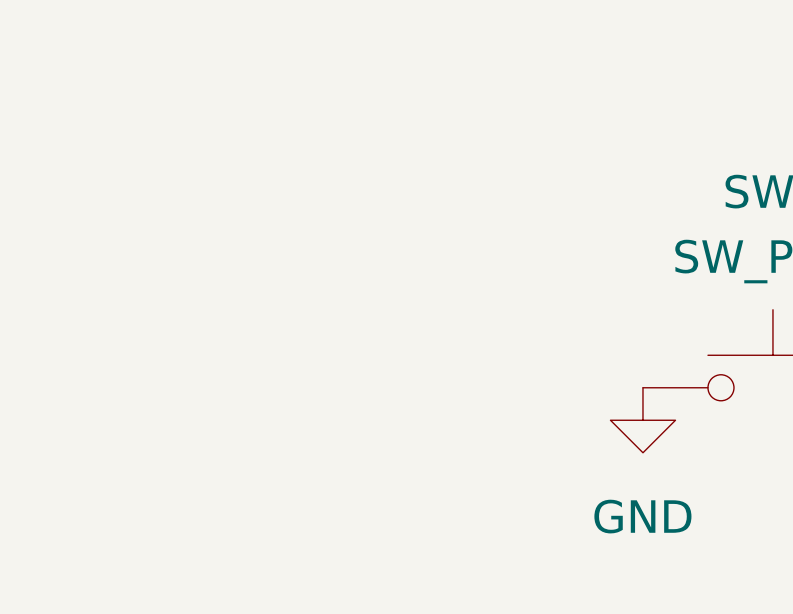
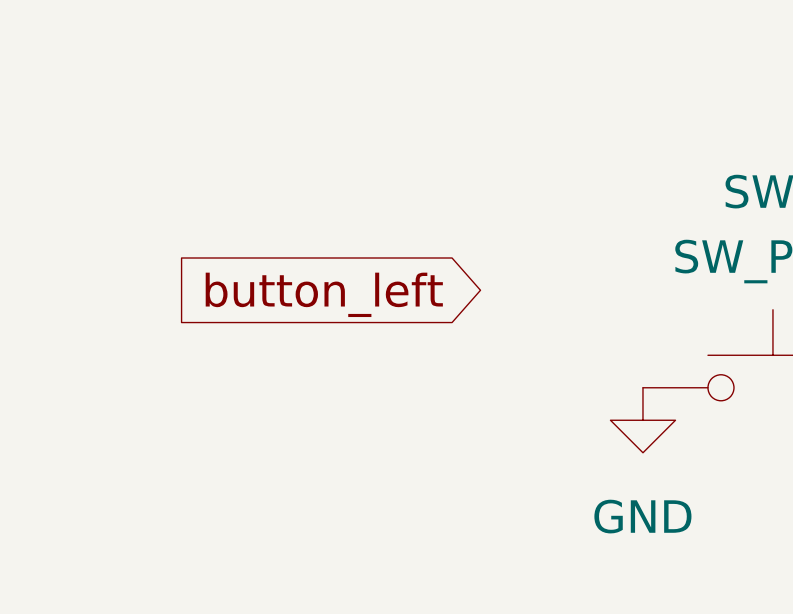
global label: none -> button_left (324, 294)

